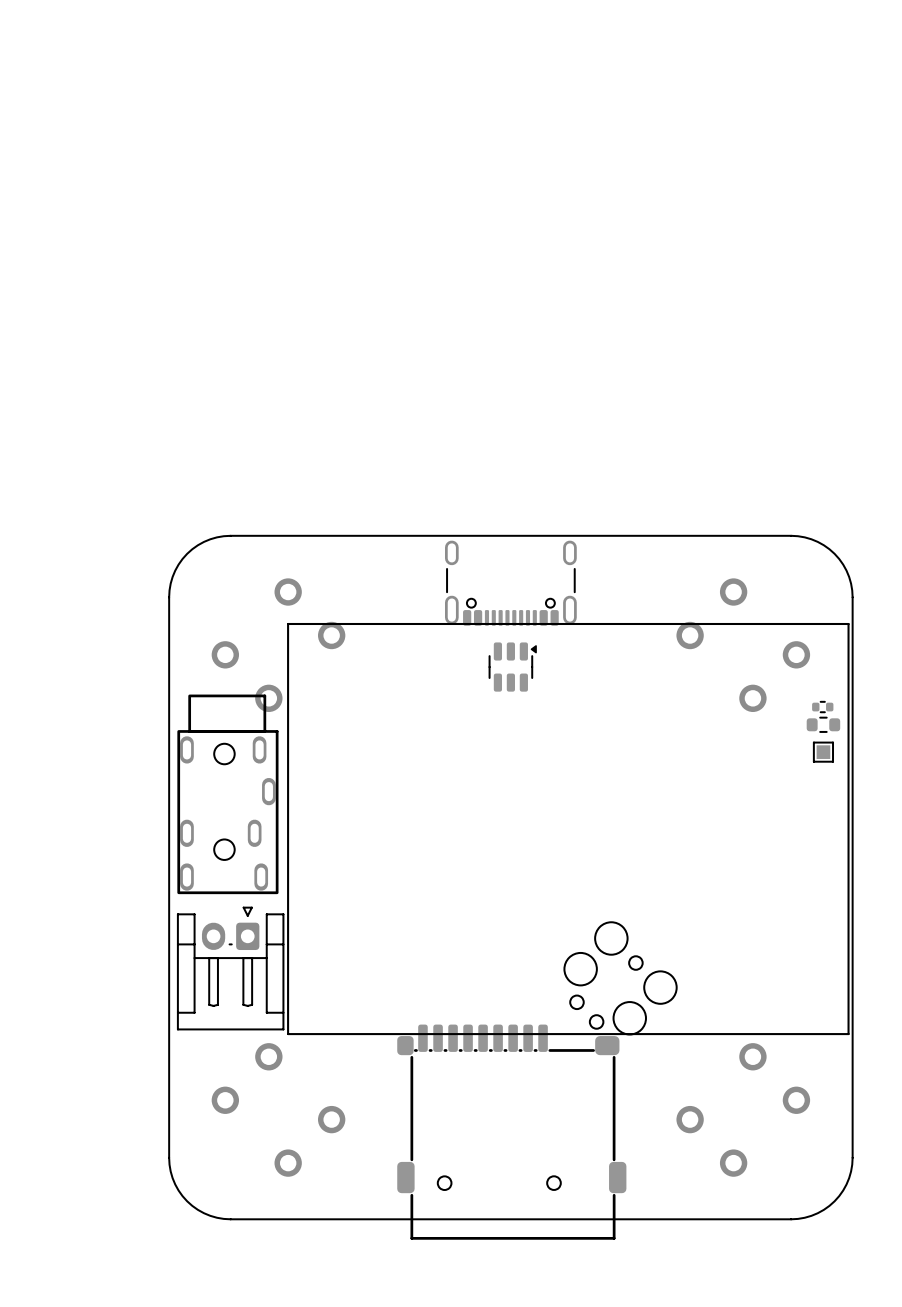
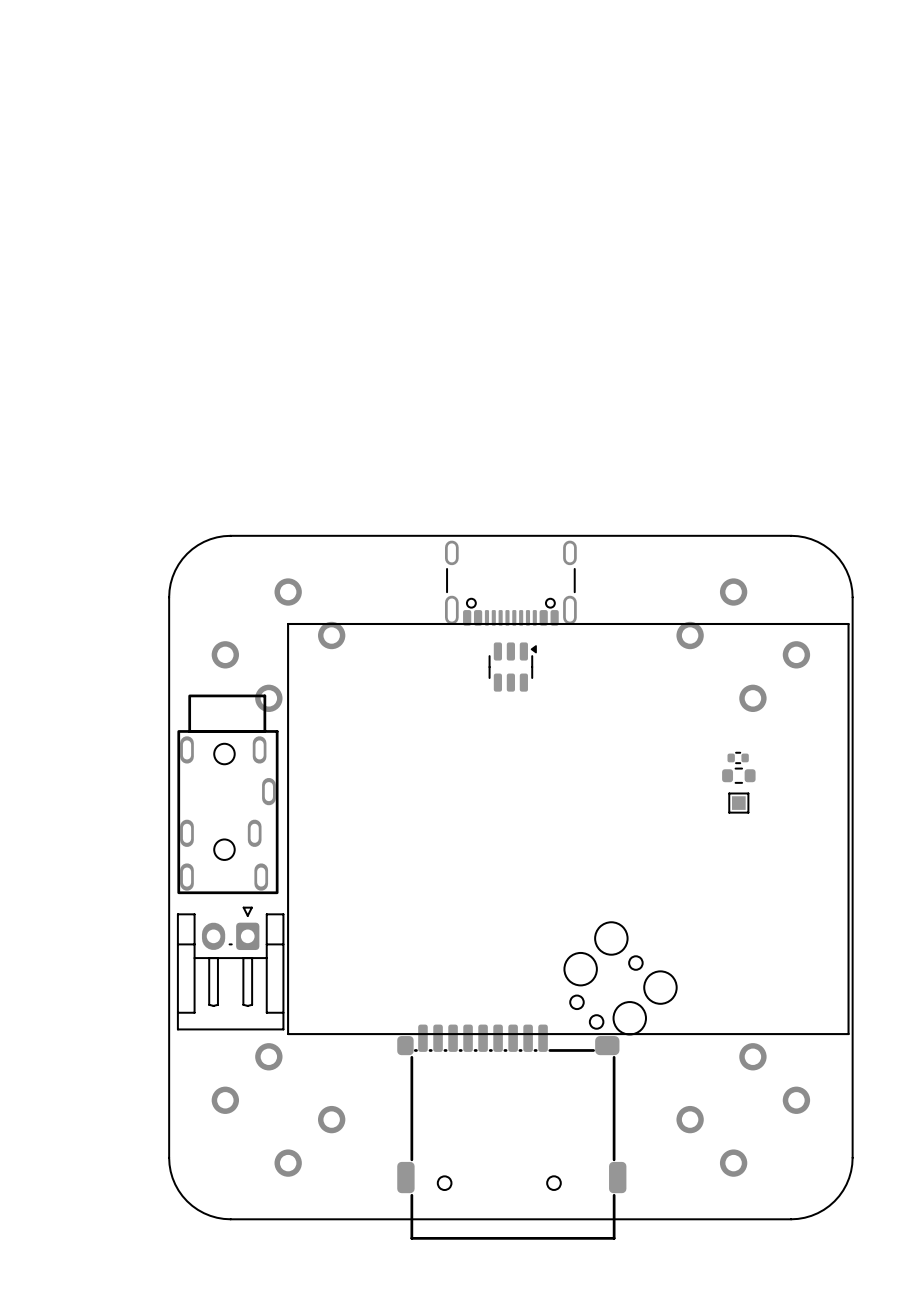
part position: (822, 707) -> (738, 757)
part position: (823, 724) -> (738, 775)
part position: (823, 752) -> (738, 803)

